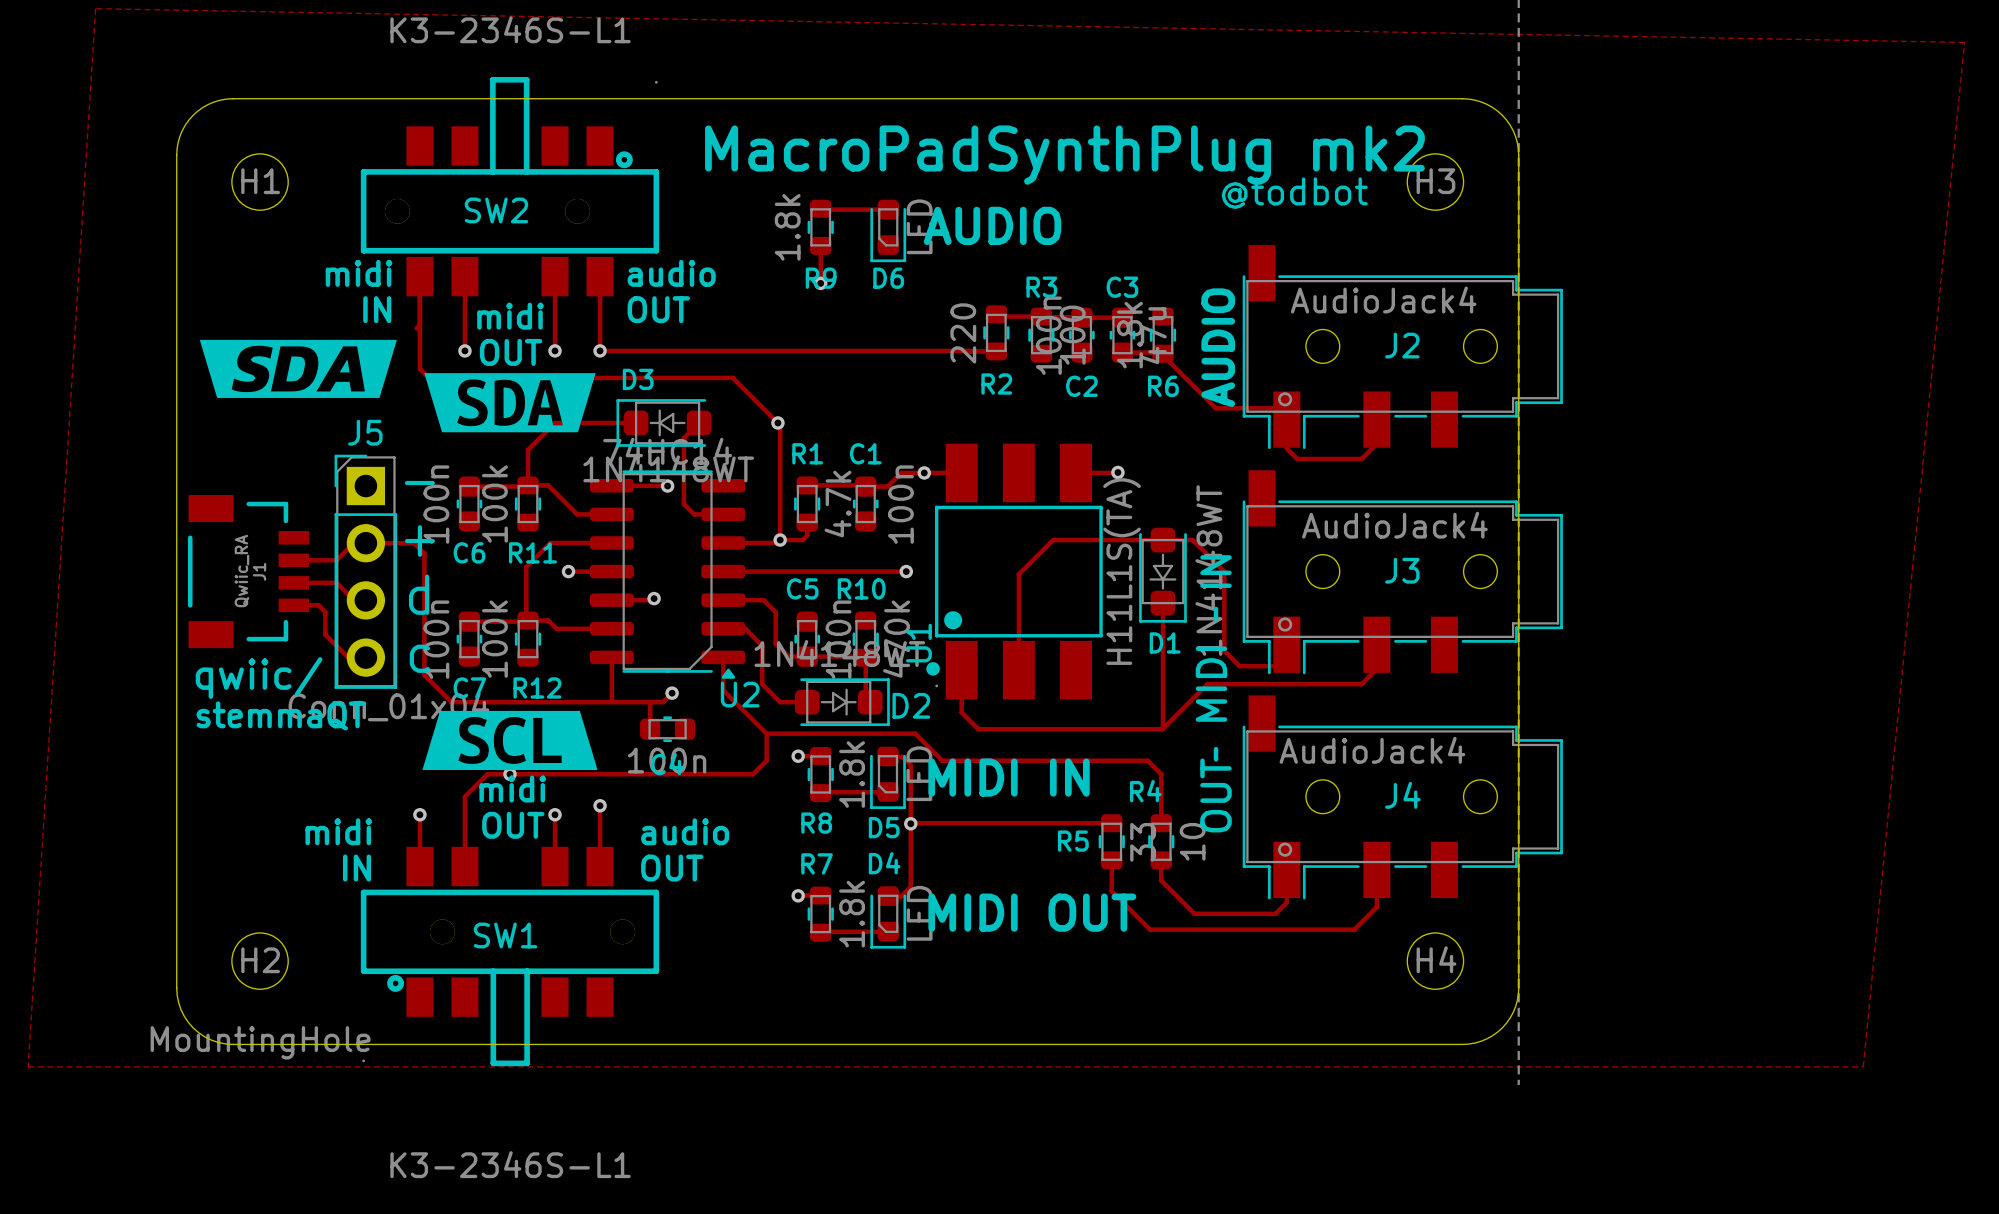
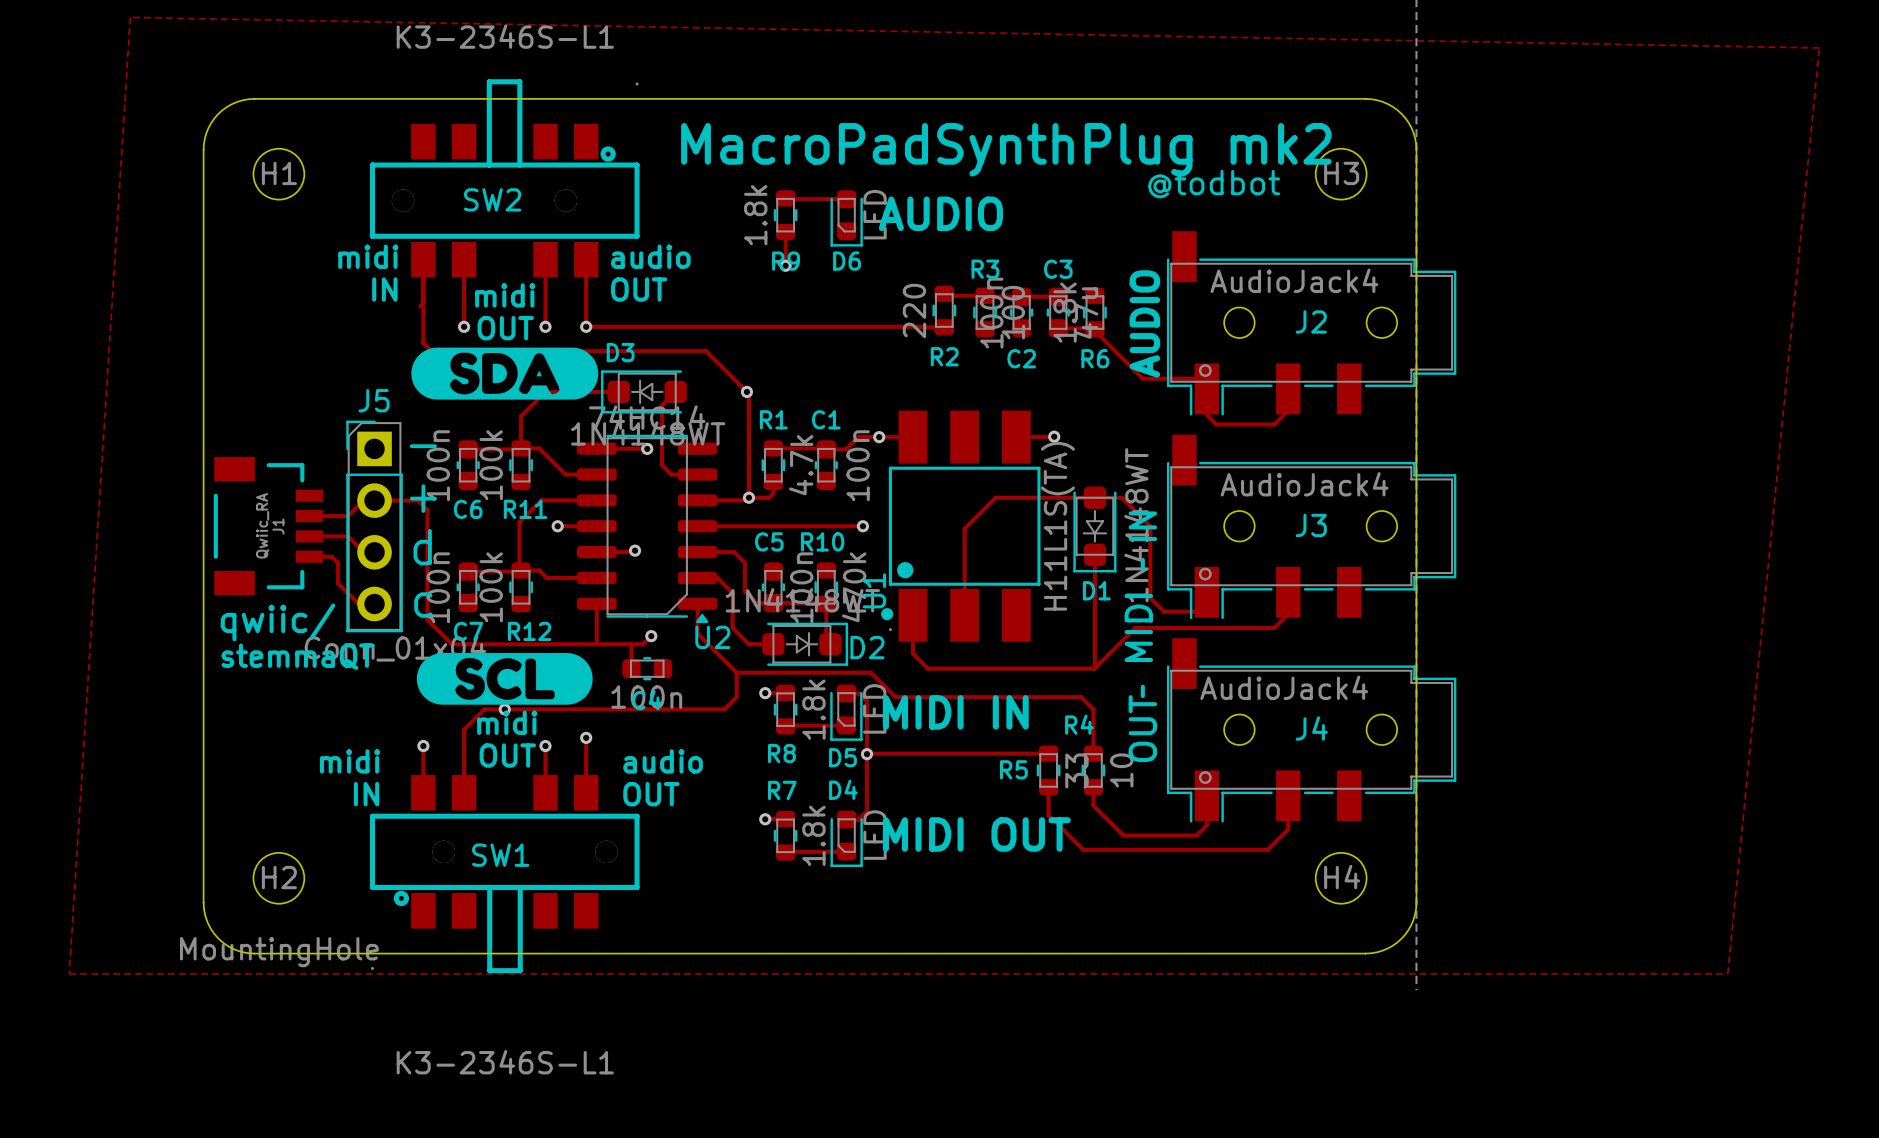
drawing: [199, 339, 397, 398] -> none
drawing shape: [424, 373, 596, 433] -> [411, 347, 599, 400]
drawing shape: [422, 710, 598, 771] -> [416, 653, 593, 705]

